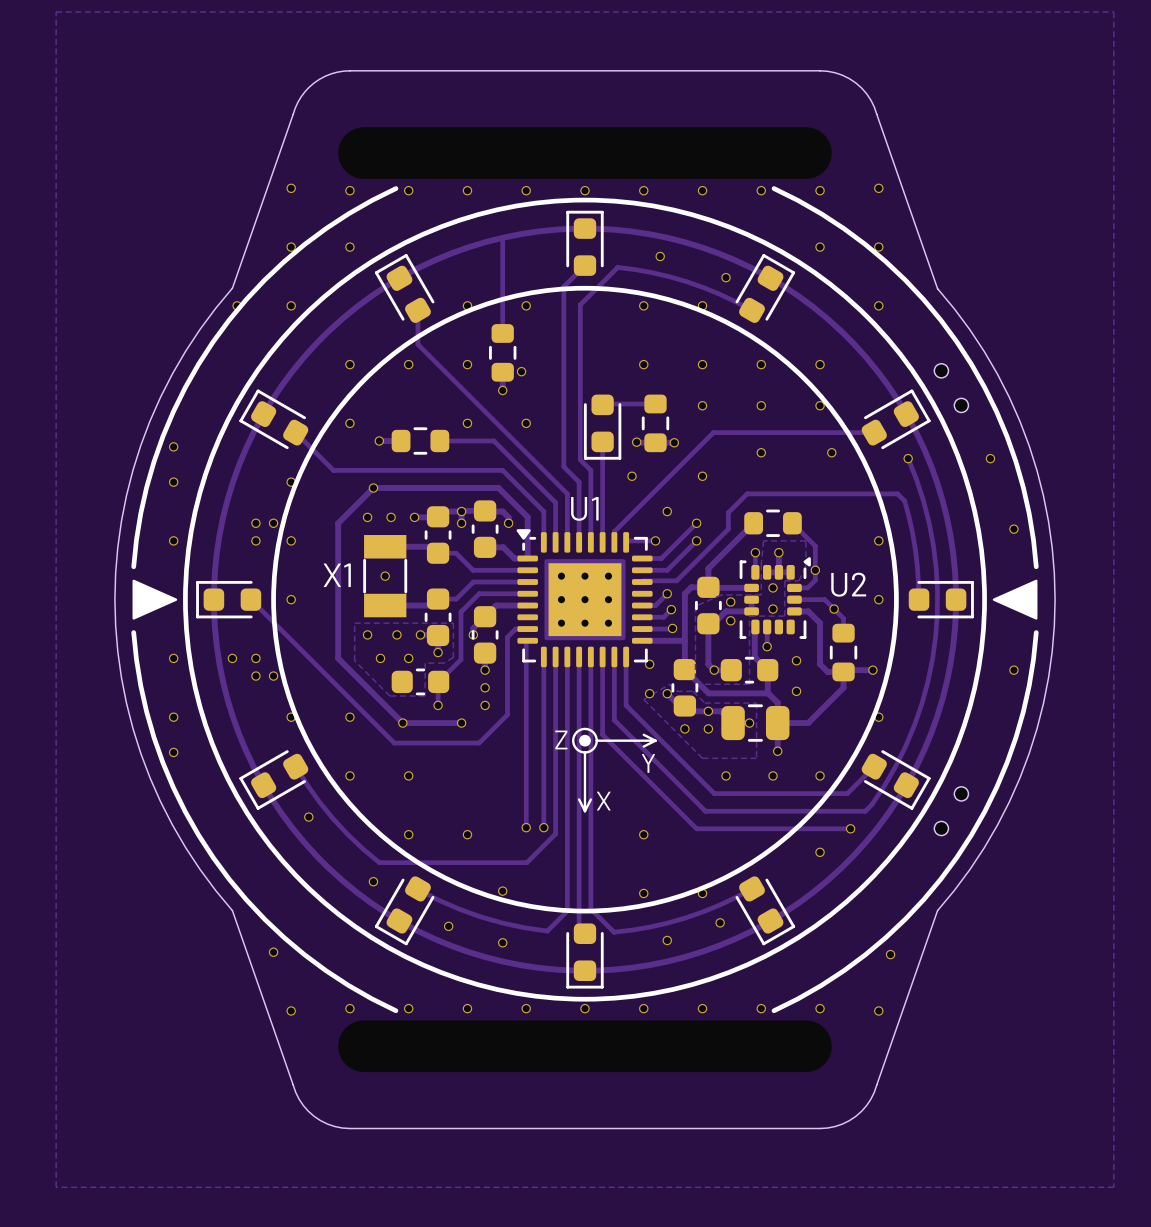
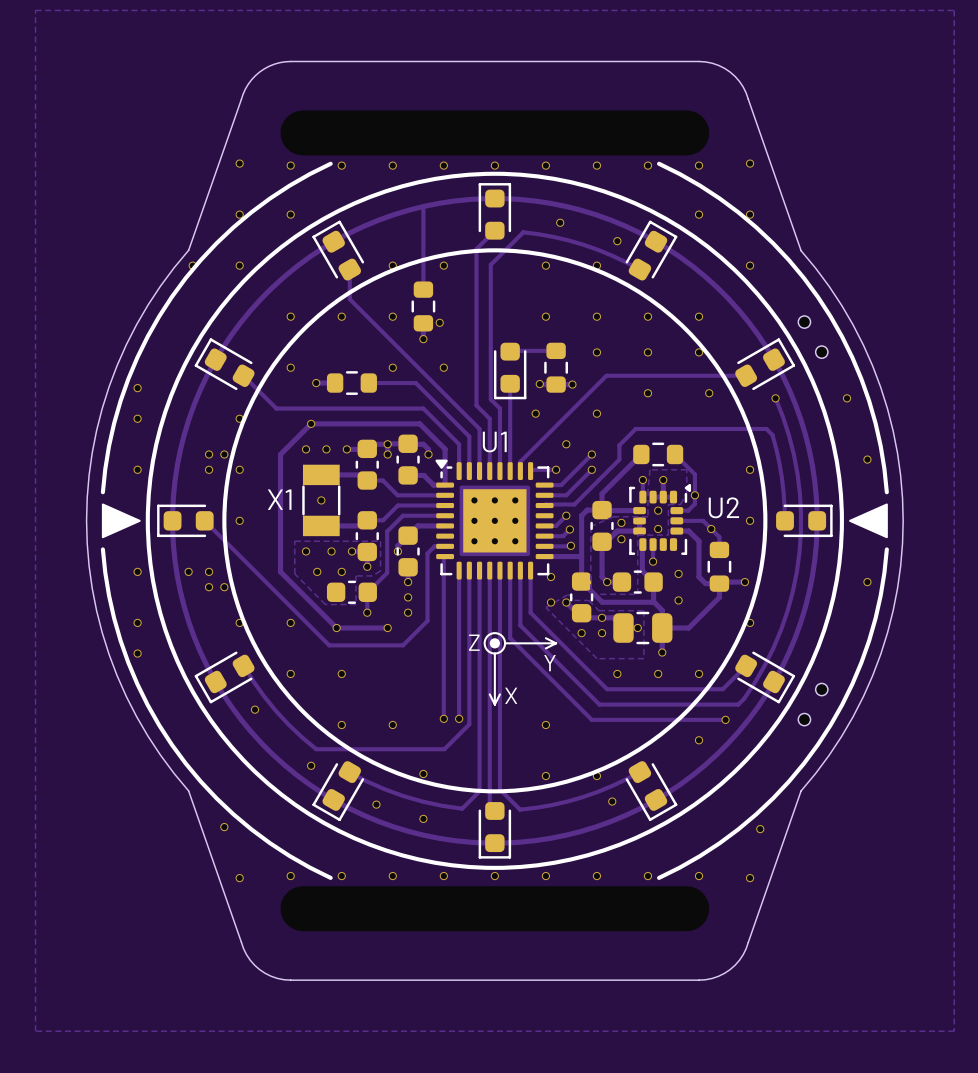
via: (667, 940) -> none

